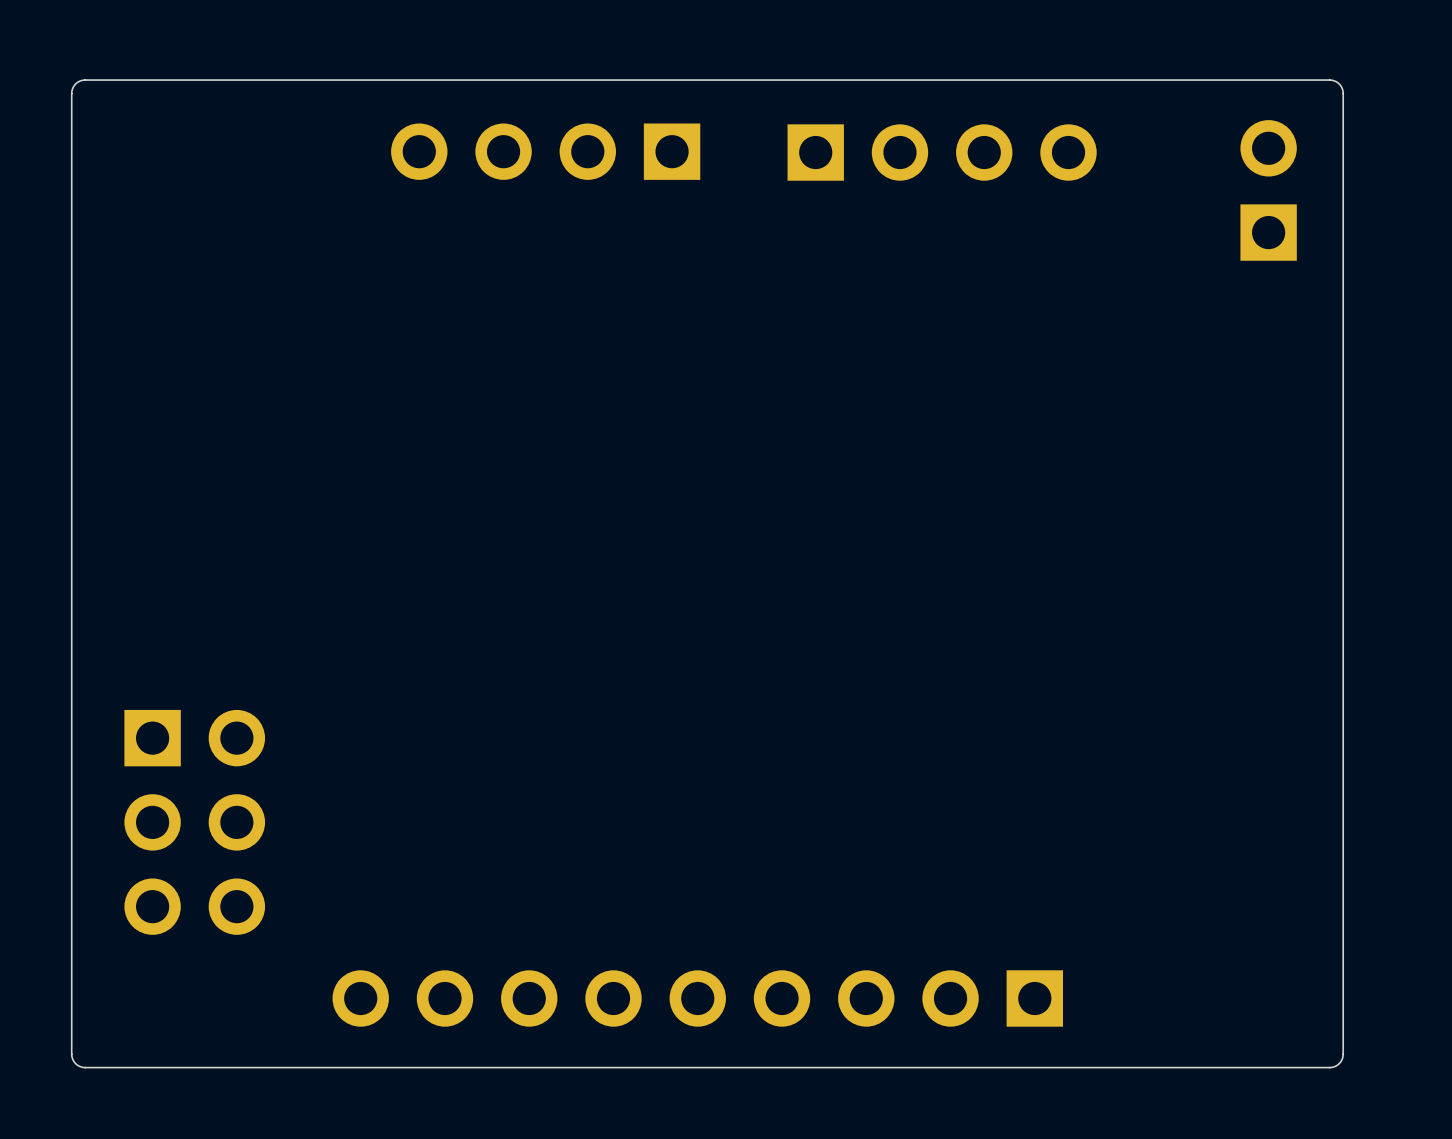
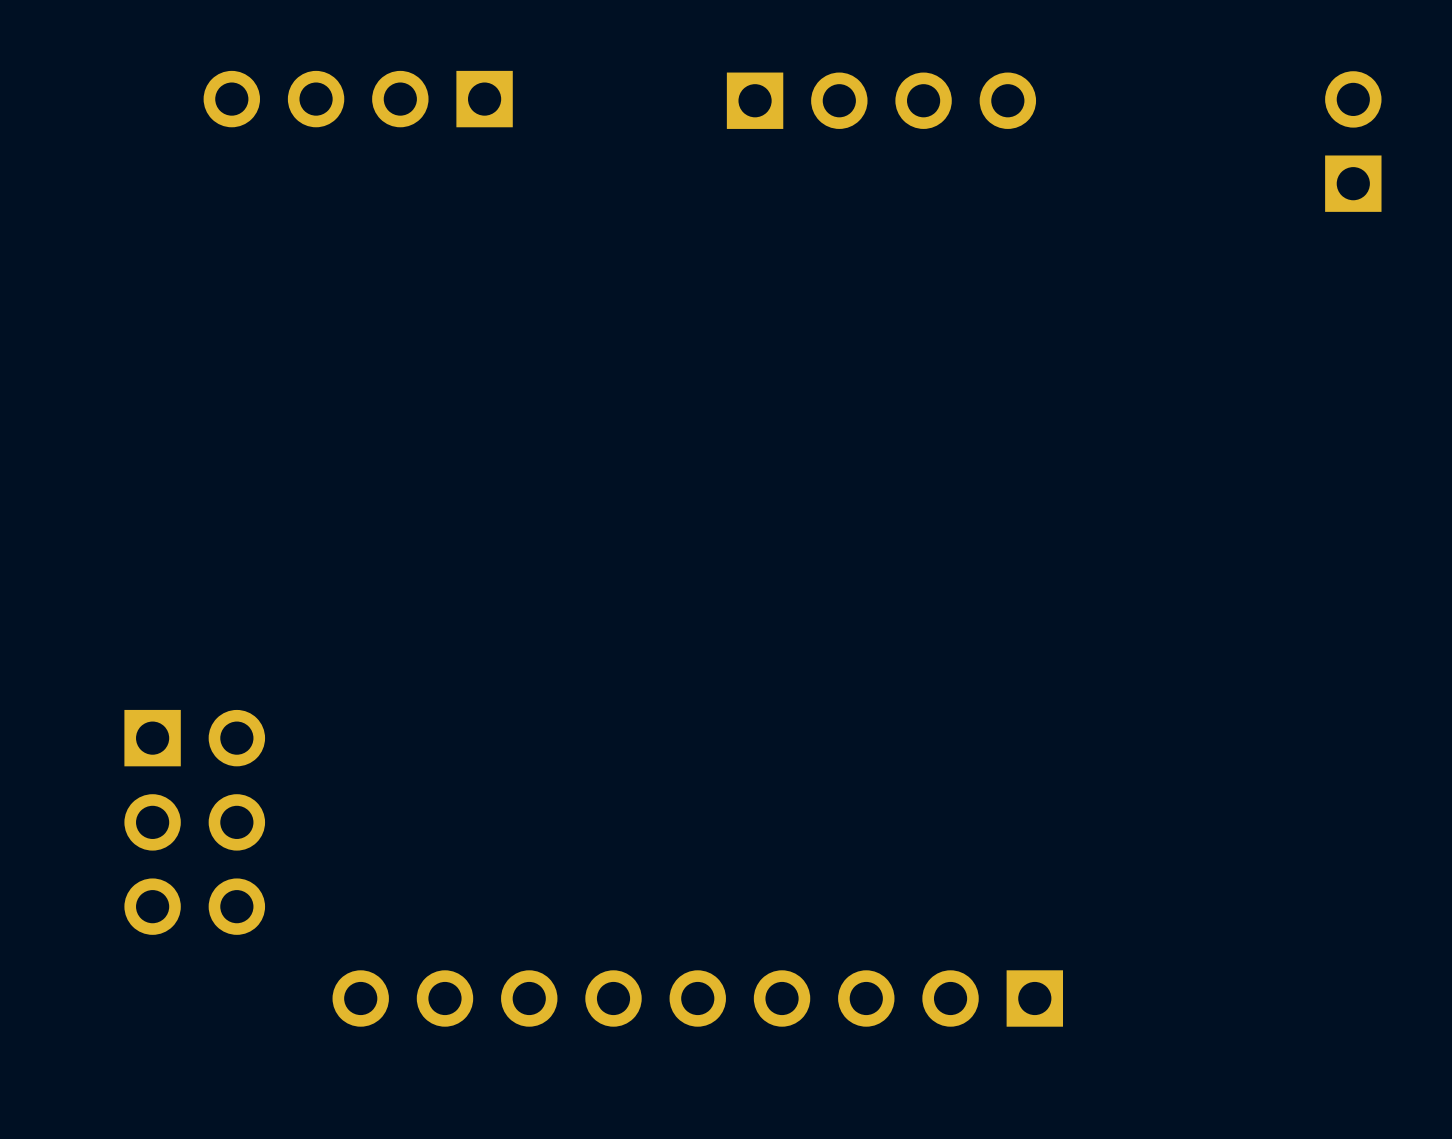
board edge: (1329, 80) (85, 80) (76, 82) (71, 93) (71, 1054) (74, 1062) (85, 1067) (1329, 1067) (1337, 1064) (1343, 1054) (1343, 93) (1339, 84) (1329, 80) -> none
part: none -> (358, 99)
part: (545, 151) -> none
part position: (942, 152) -> (881, 100)
part position: (1268, 190) -> (1353, 141)

